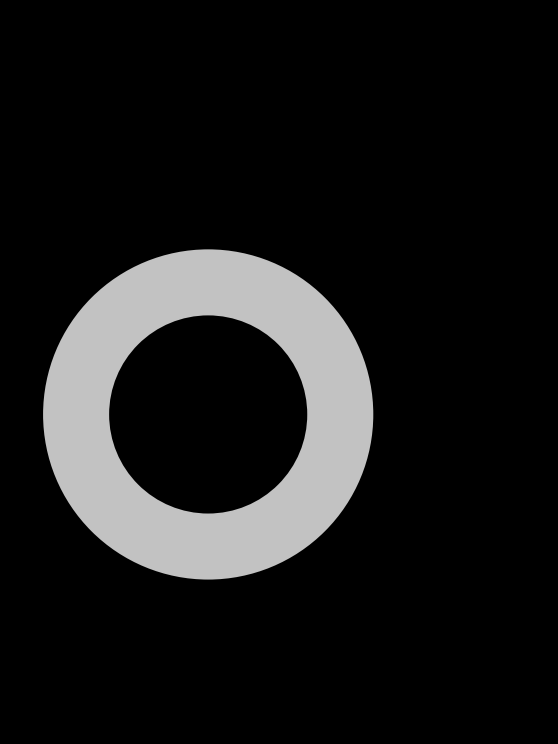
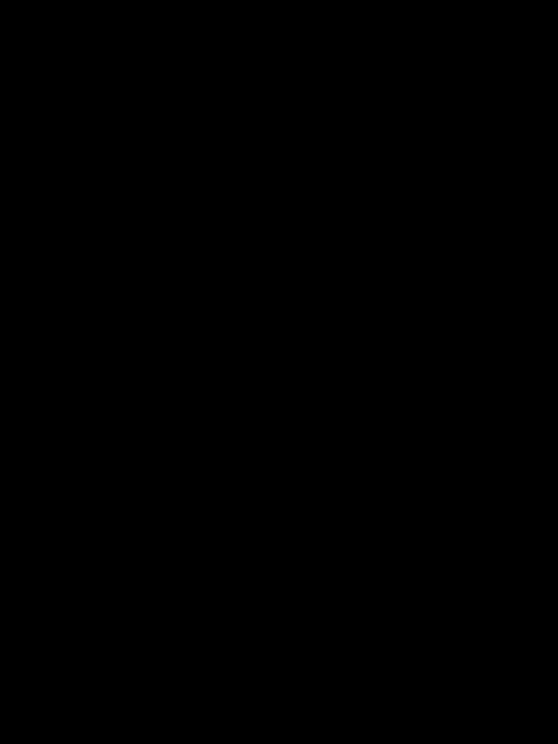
via: (208, 414) -> none

